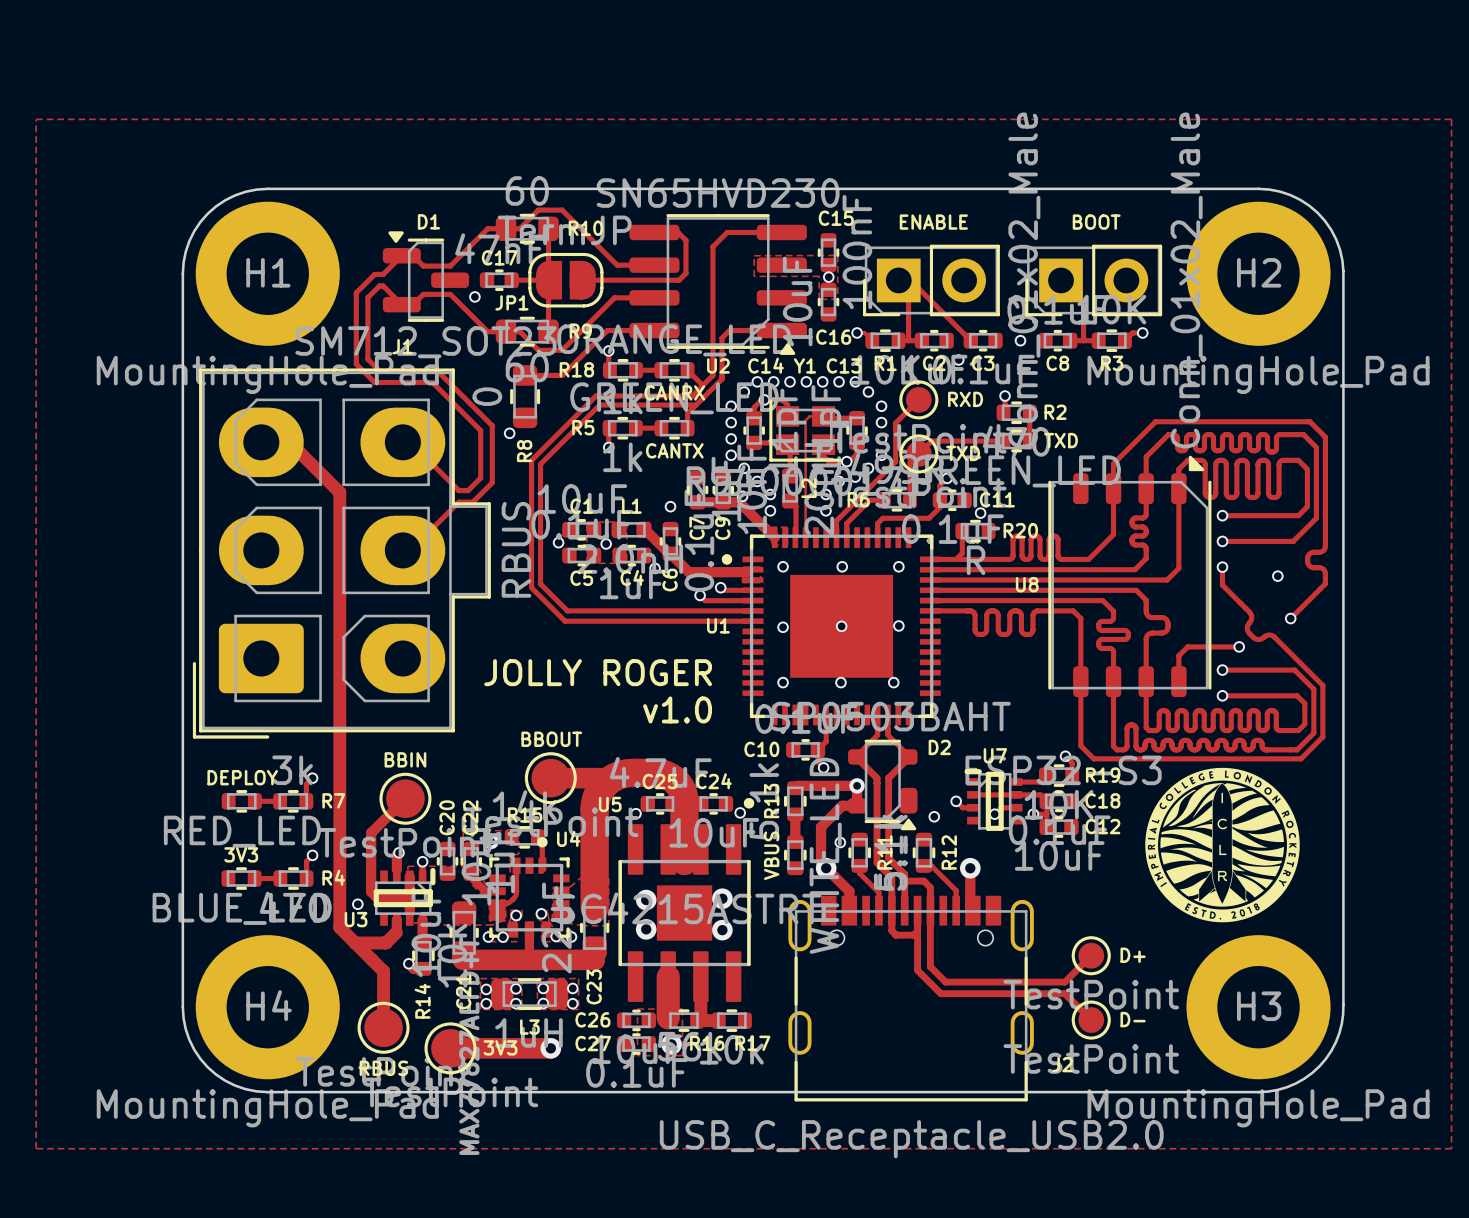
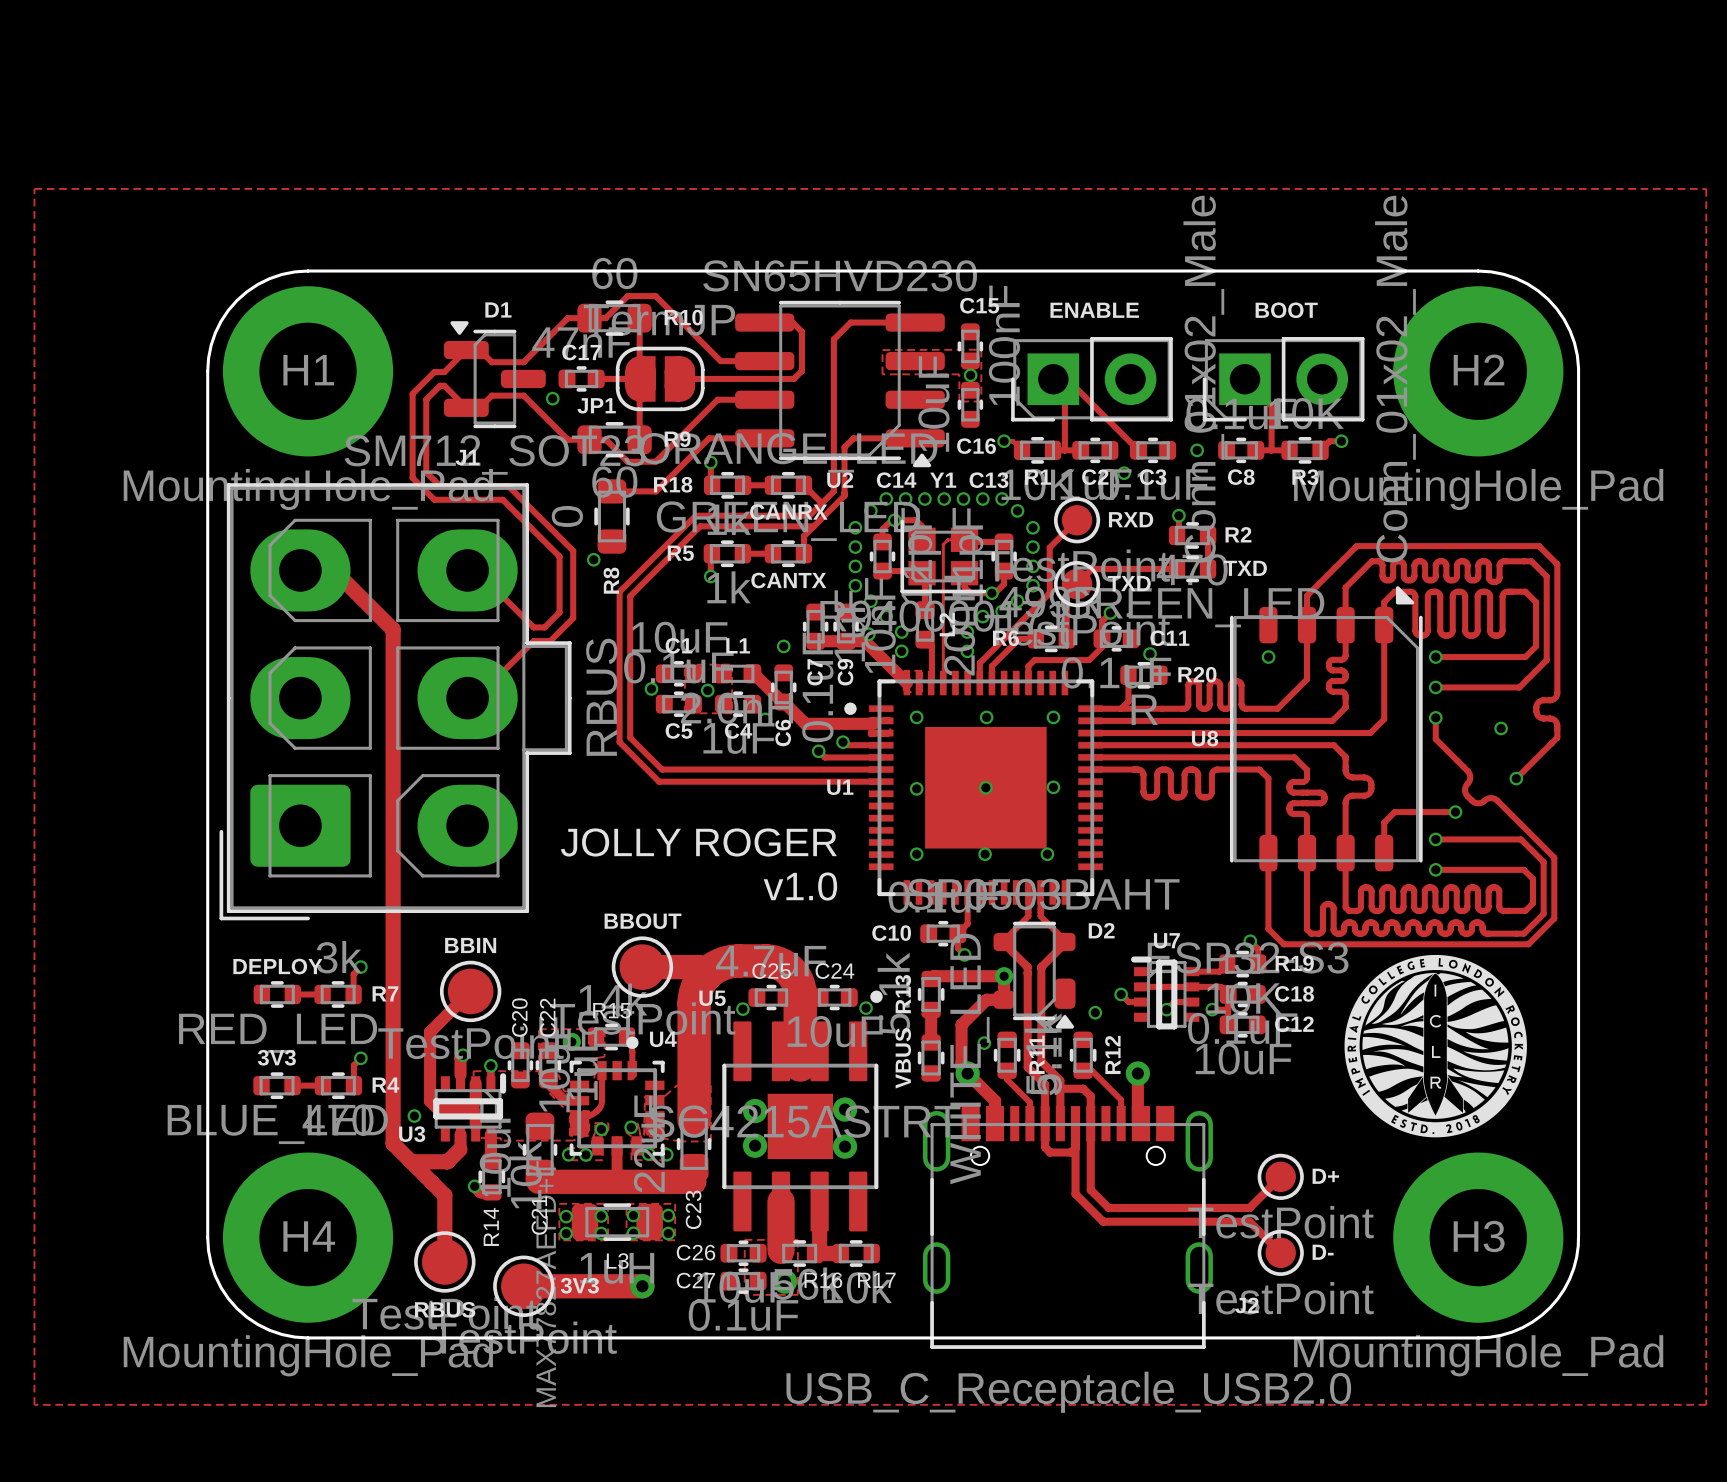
via: none -> (1268, 657)

